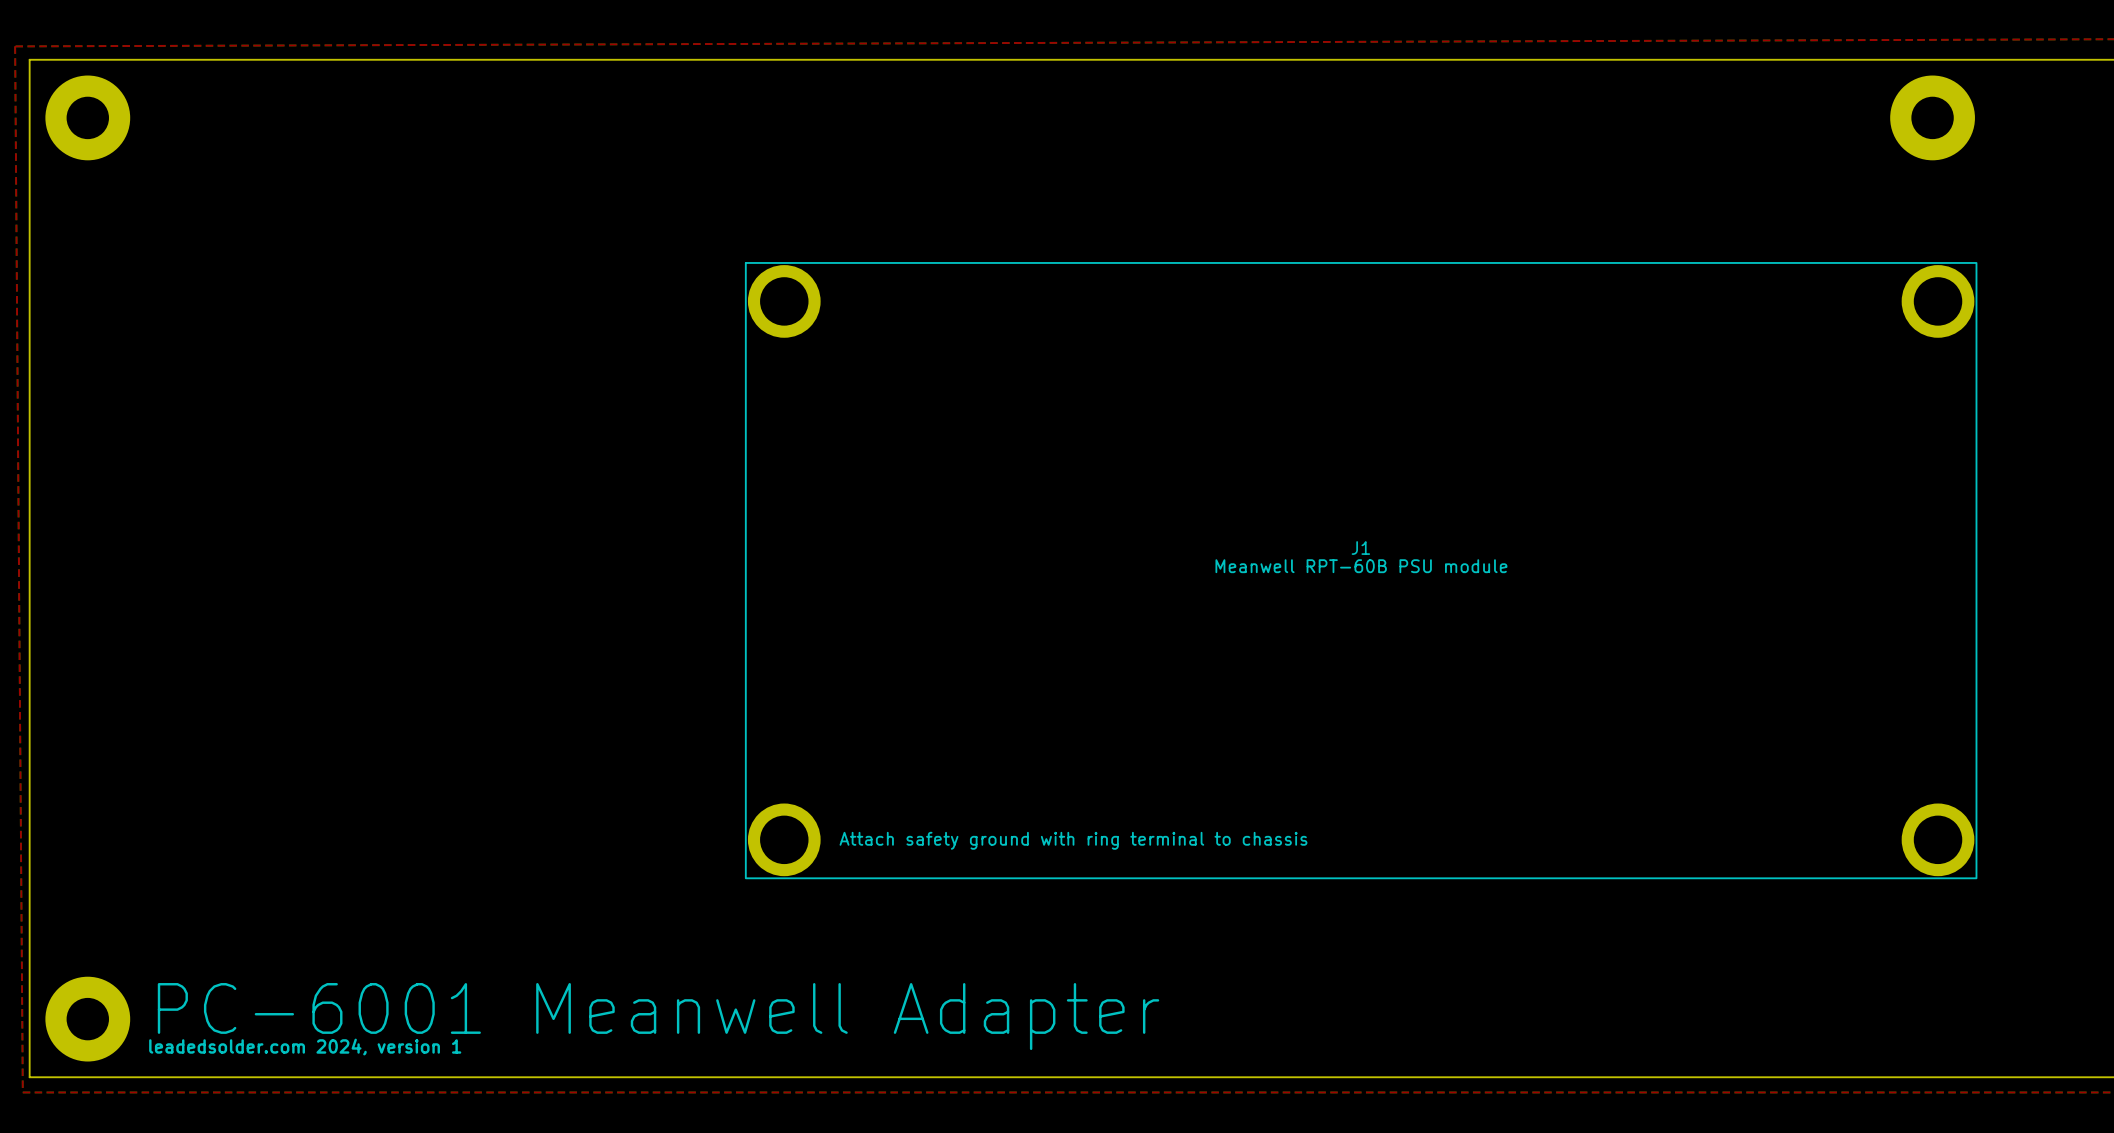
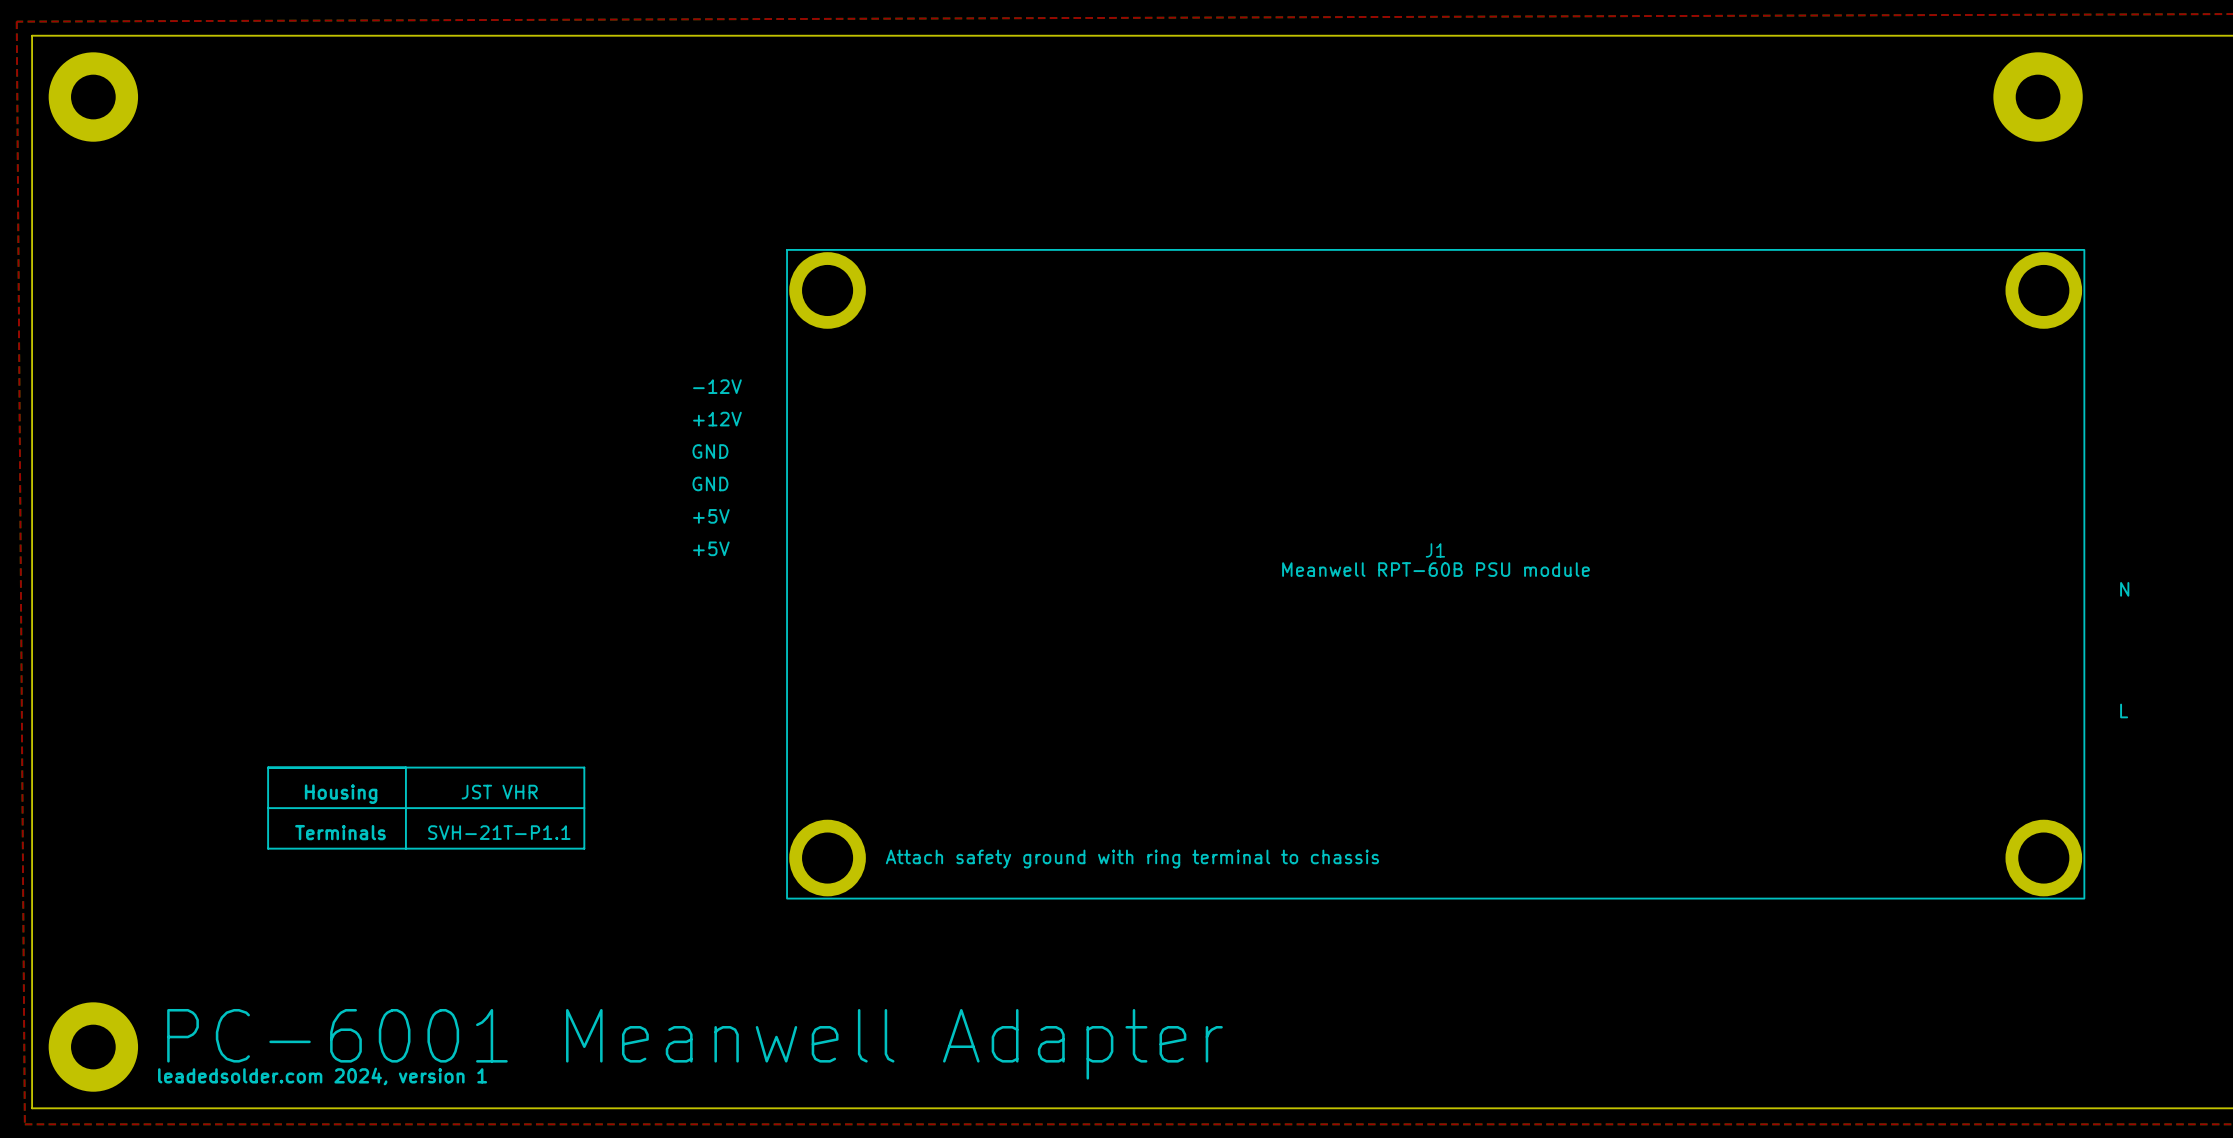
text: none -> -12V (717, 386)
text: none -> +12V (717, 419)
text: none -> GND (710, 451)
text: none -> GND (710, 483)
text: none -> +5V (711, 516)
text: none -> +5V (711, 548)
text: none -> N (2124, 589)
text: none -> L (2124, 710)
line: none -> (268, 767) (584, 767) (584, 848) (268, 848) (268, 767)
line: none -> (405, 767) (405, 848)
text: none -> JST VHR (499, 792)
text: none -> Housing (341, 794)
line: none -> (268, 808) (584, 808)
text: none -> Terminals (340, 832)
text: none -> SVH-21T-P1.1 (499, 832)

